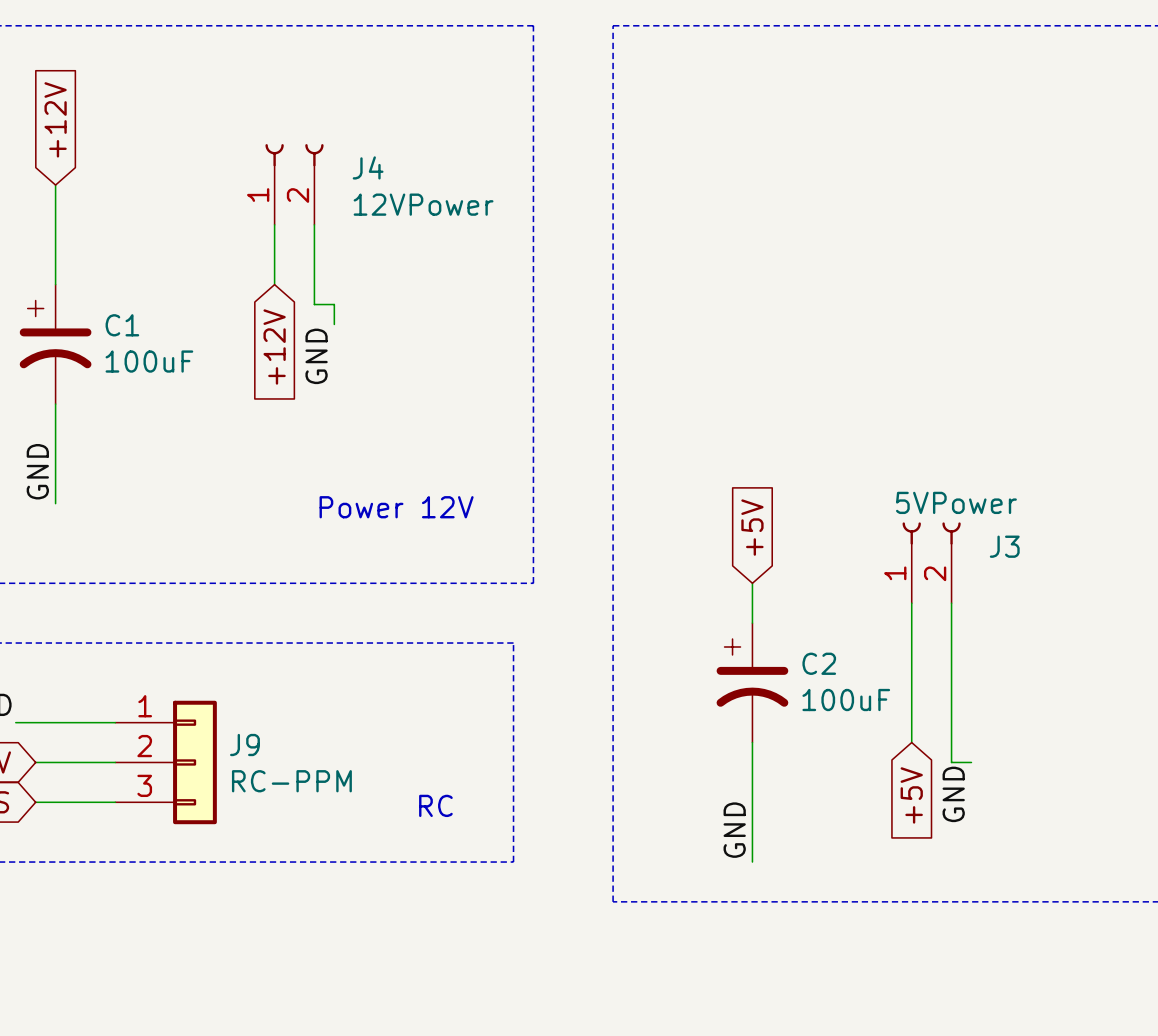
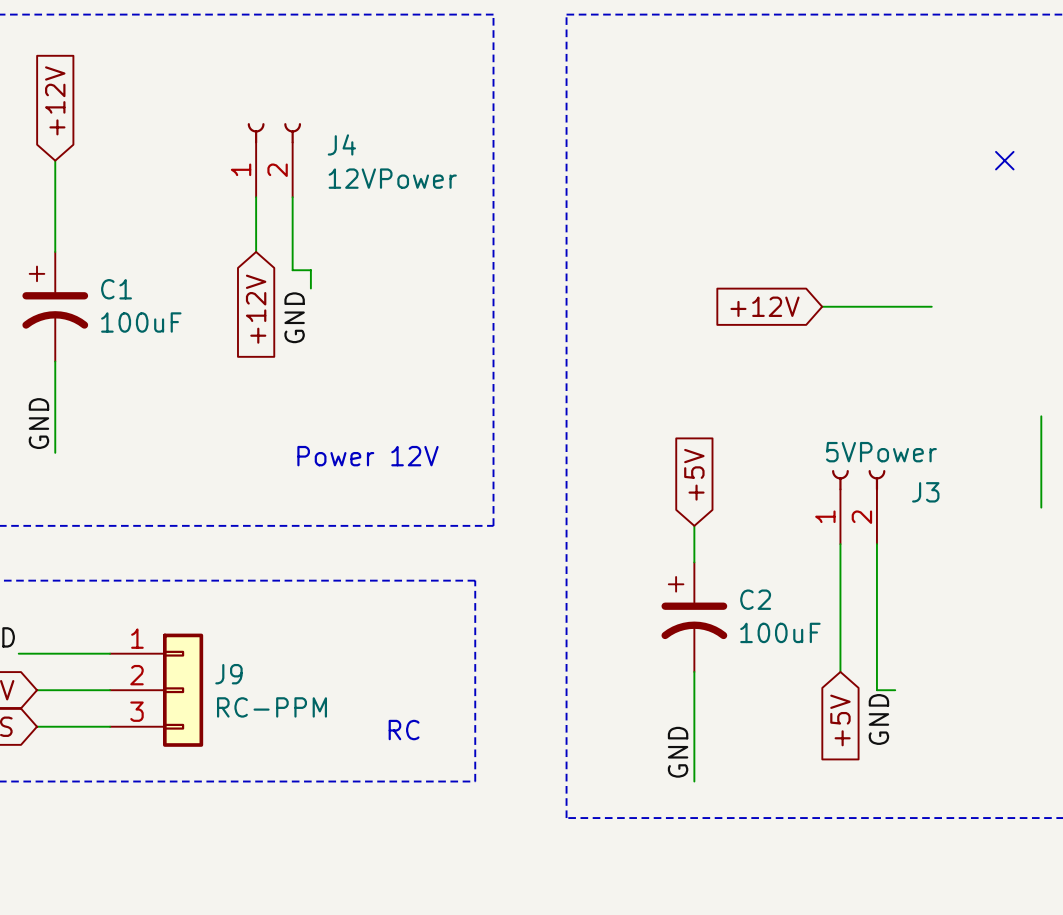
no-connect mark: none -> (1004, 160)
global label: none -> +12V (764, 306)
wire: none -> (822, 306) (931, 306)
wire: none -> (1041, 416) (1041, 507)

